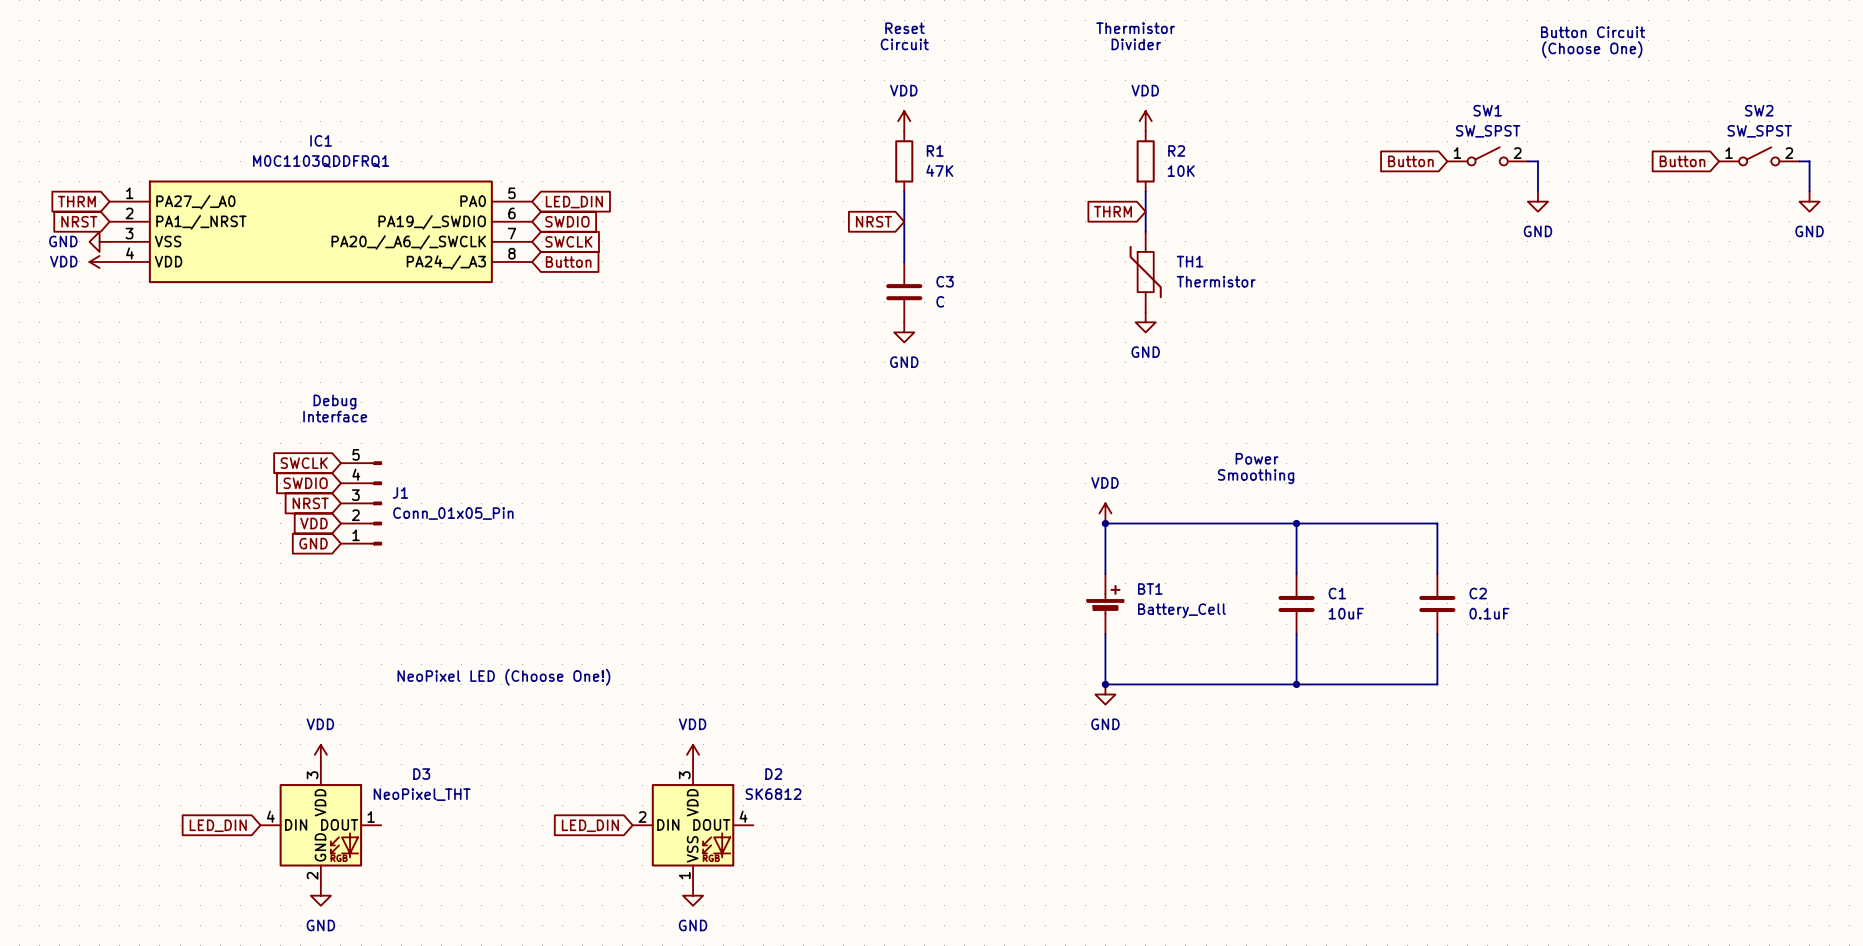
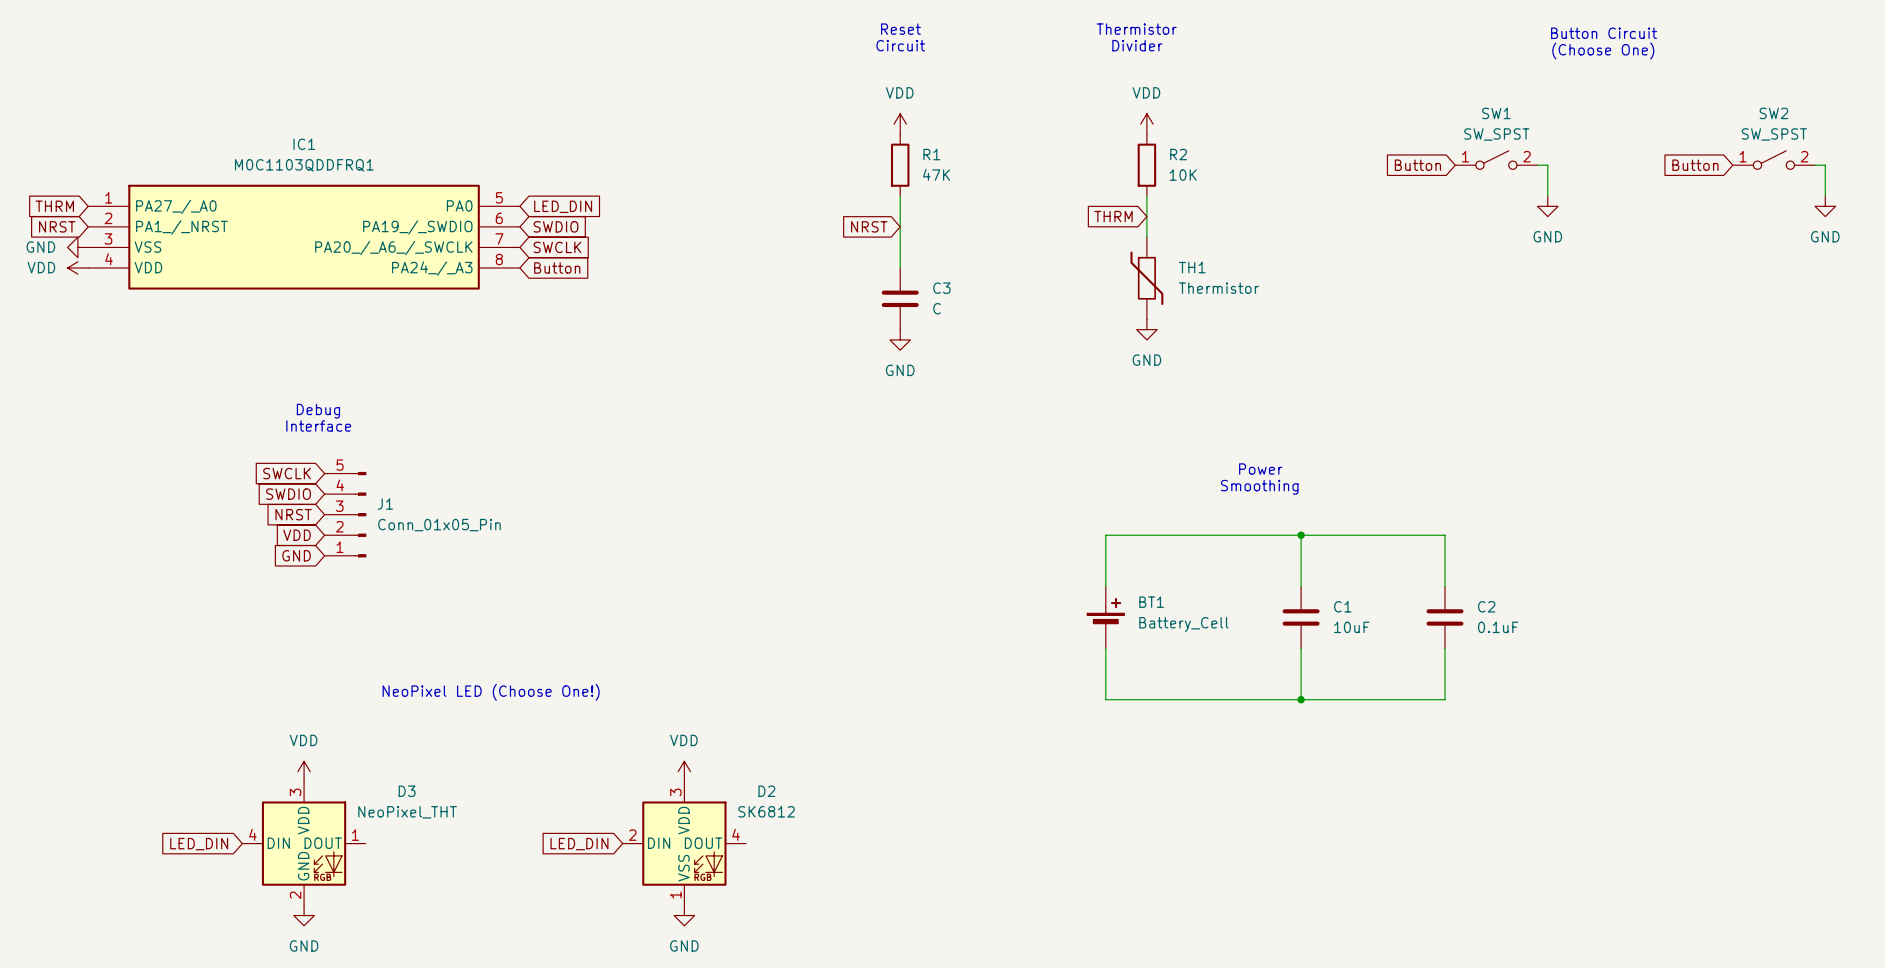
power symbol: VDD (1105, 513) -> none
junction: (1105, 523) -> none
junction: (1105, 684) -> none
power symbol: GND (1105, 694) -> none

